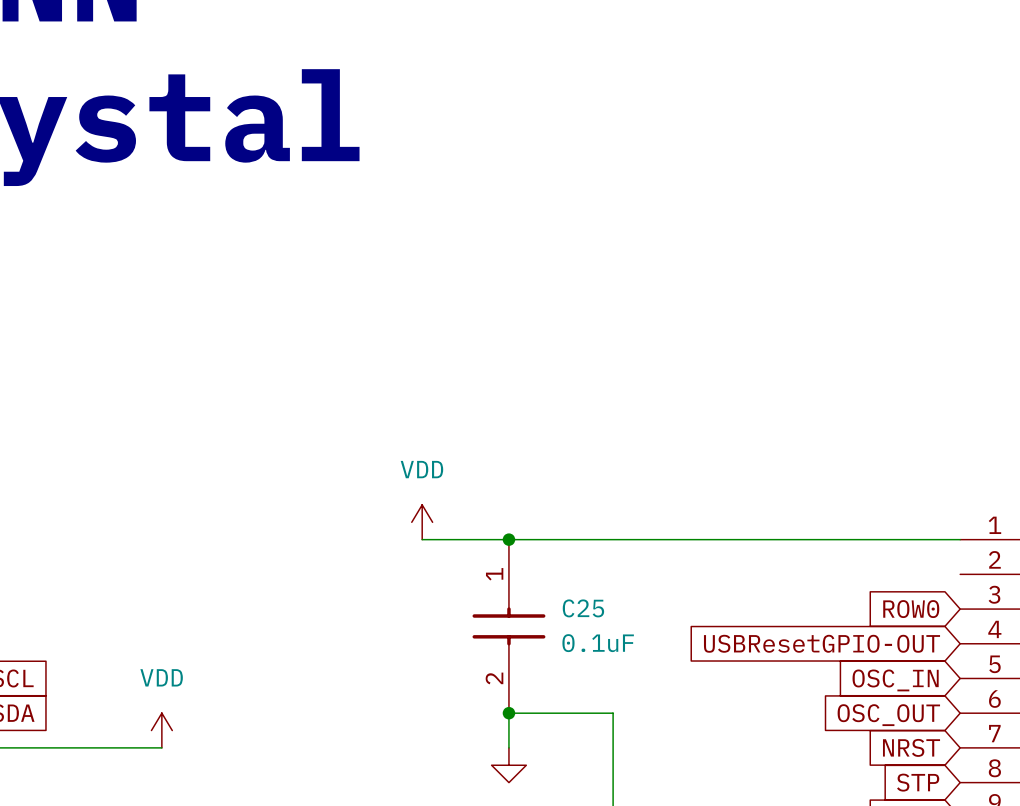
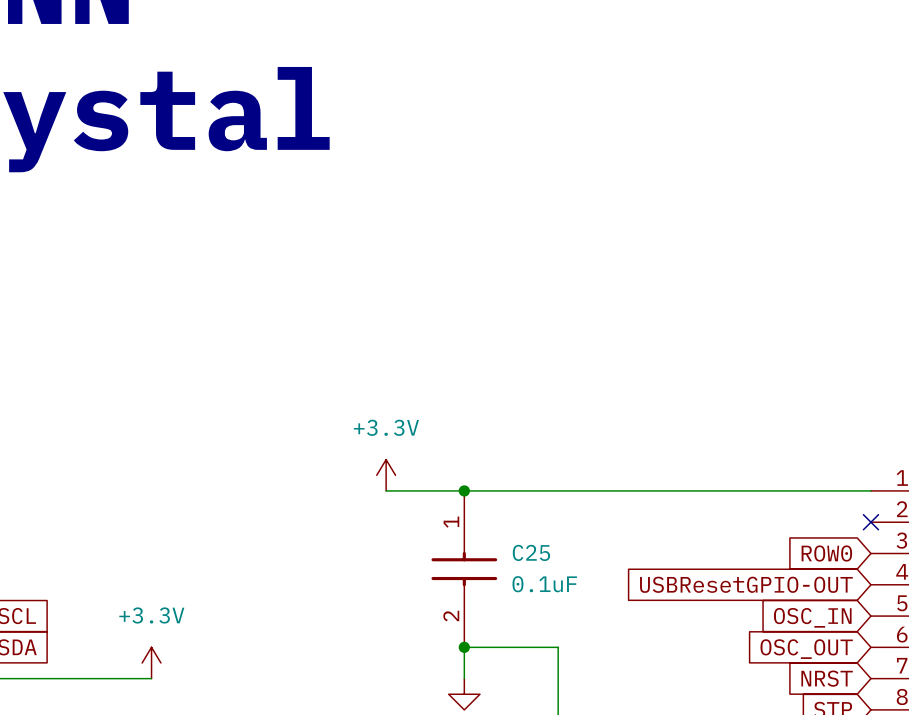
power symbol: VDD (422, 522) -> +3.3V (386, 475)
no-connect mark: none -> (870, 522)
power symbol: VDD (161, 730) -> +3.3V (151, 662)

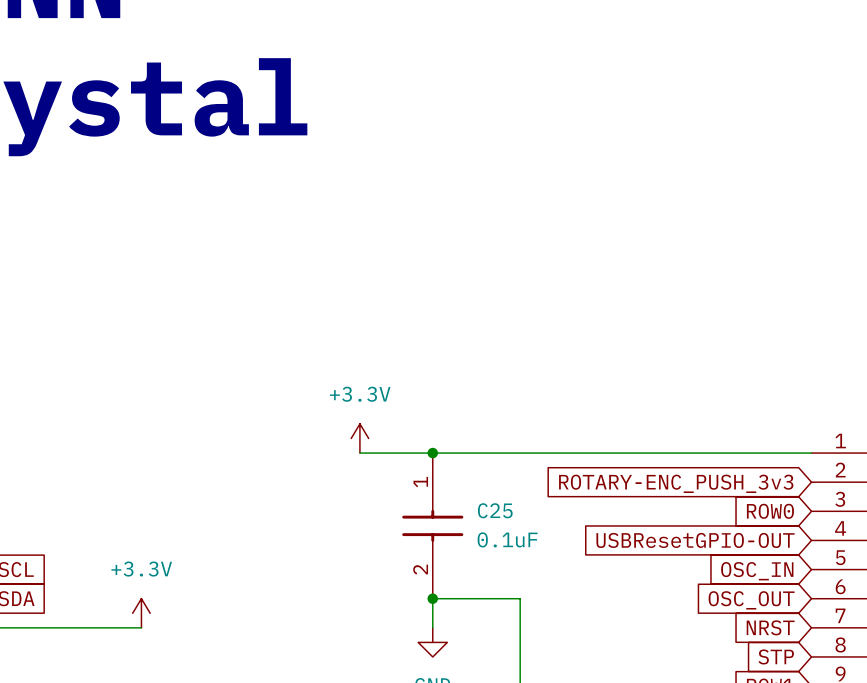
no-connect mark: (870, 522) -> none
global label: none -> ROTARY-ENC_PUSH_3v3 (676, 483)

